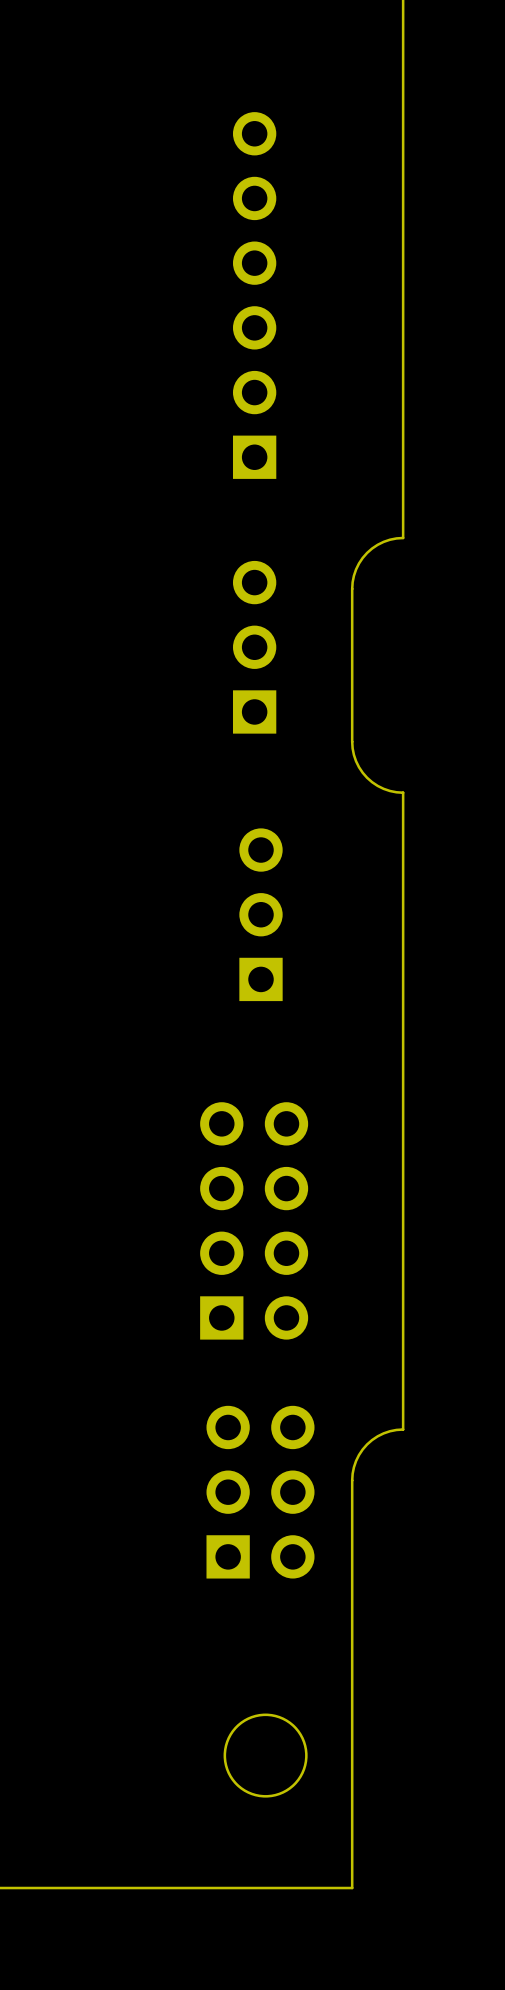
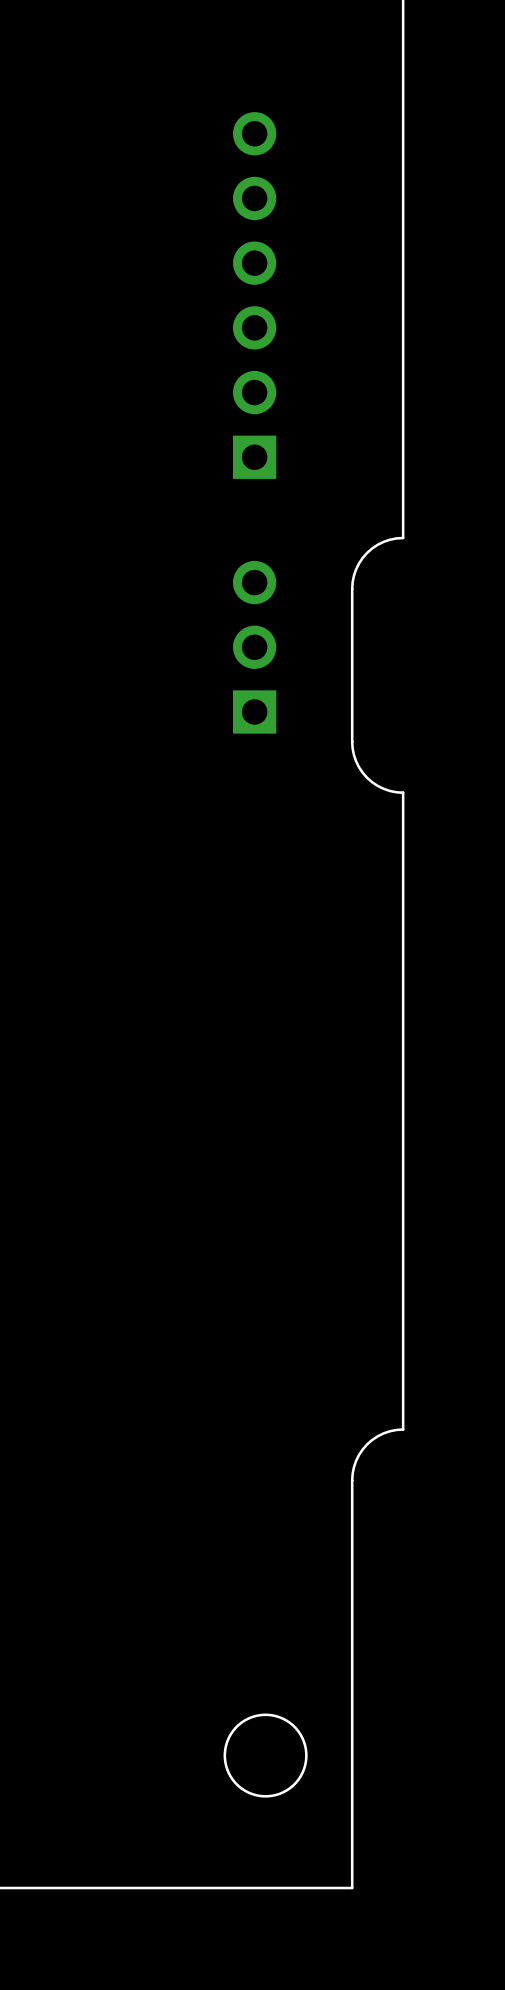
part: (261, 914) -> none
part: (254, 1220) -> none
part: (260, 1492) -> none

